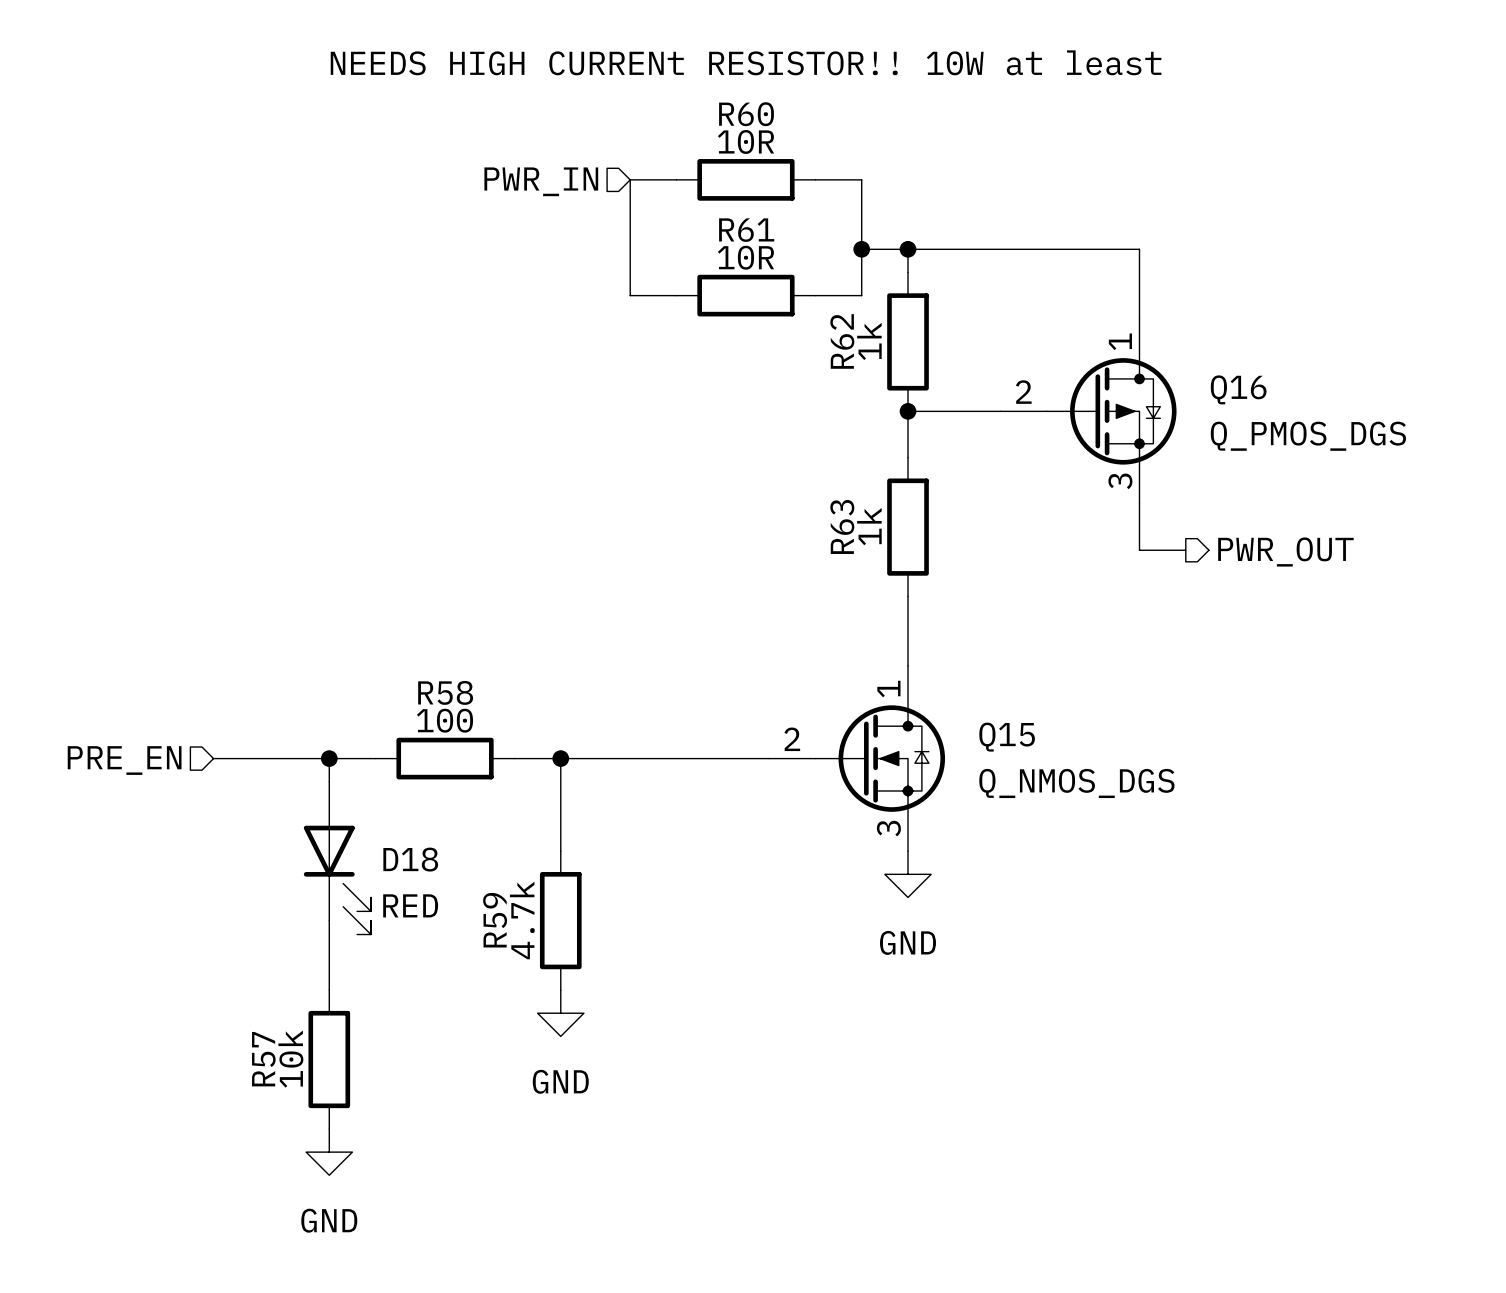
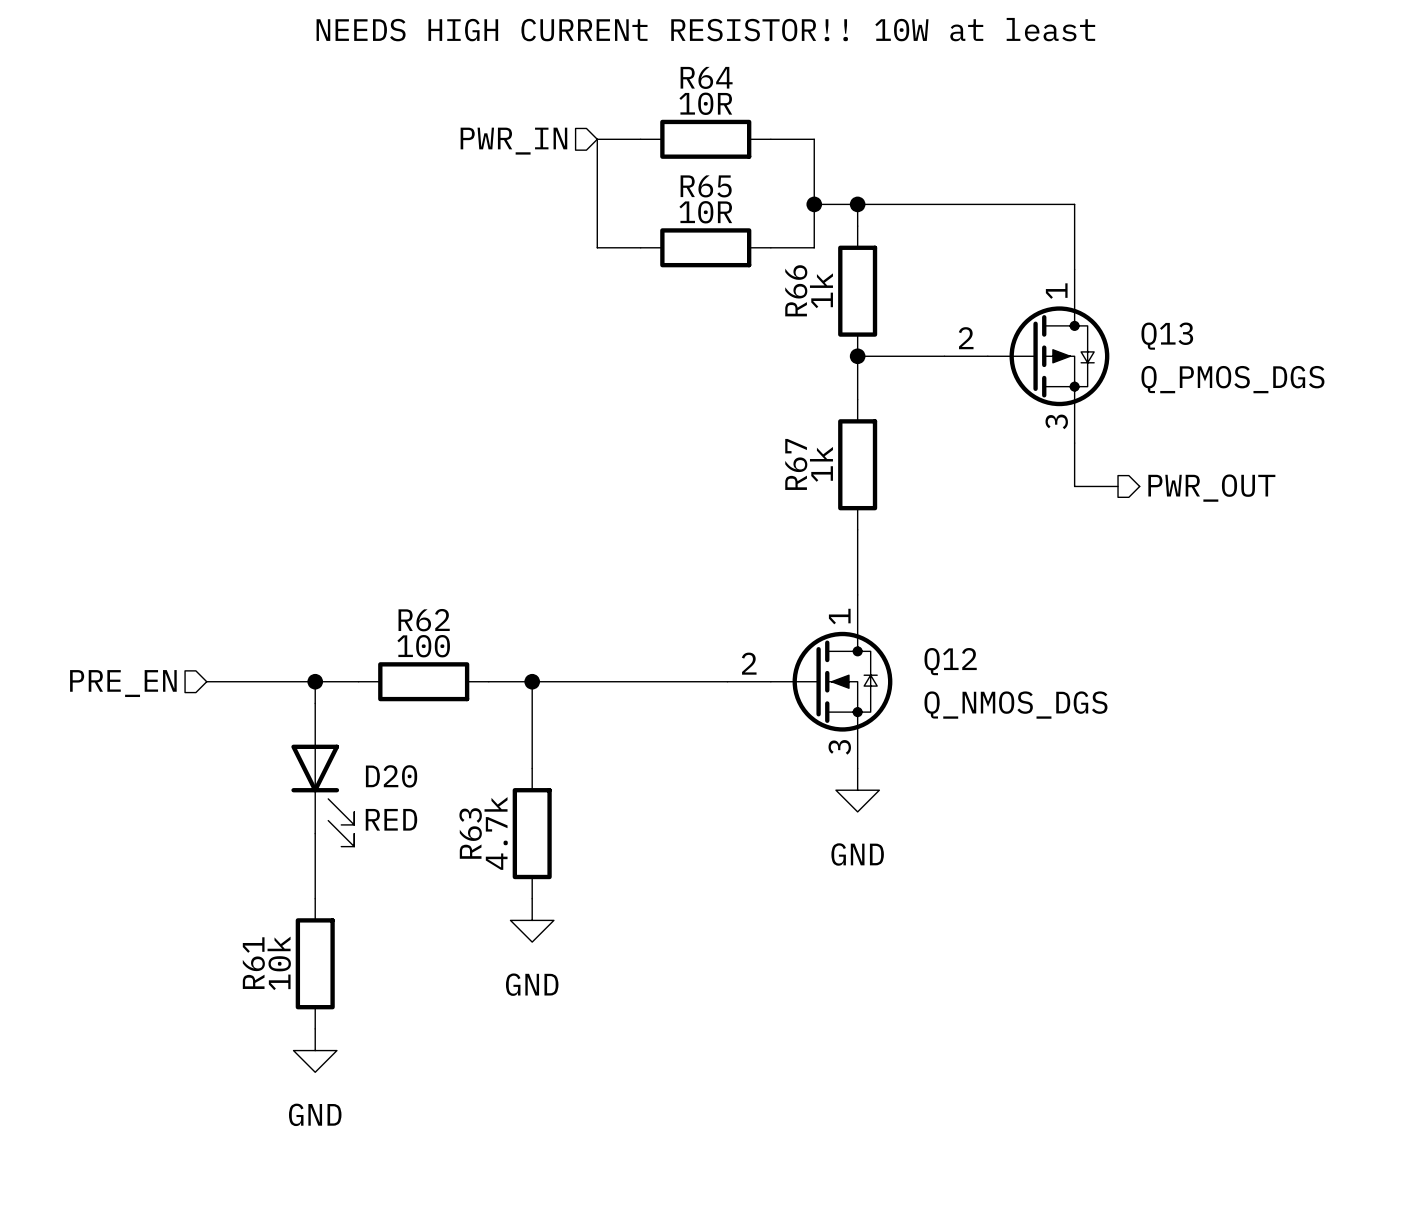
R60 name: R60 (746, 114) -> R64 (706, 77)
R61 name: R61 (746, 230) -> R65 (706, 186)
R62 name: R62 (842, 341) -> R66 (796, 290)
Q16 name: Q16 (1238, 389) -> Q13 (1167, 336)
R63 name: R63 (842, 526) -> R67 (796, 464)
R58 name: R58 (445, 692) -> R62 (424, 620)
Q15 name: Q15 (1007, 737) -> Q12 (950, 661)
D18 name: D18 (410, 859) -> D20 (391, 776)
R59 name: R59 (495, 920) -> R63 (470, 833)
R57 name: R57 (263, 1059) -> R61 (253, 963)

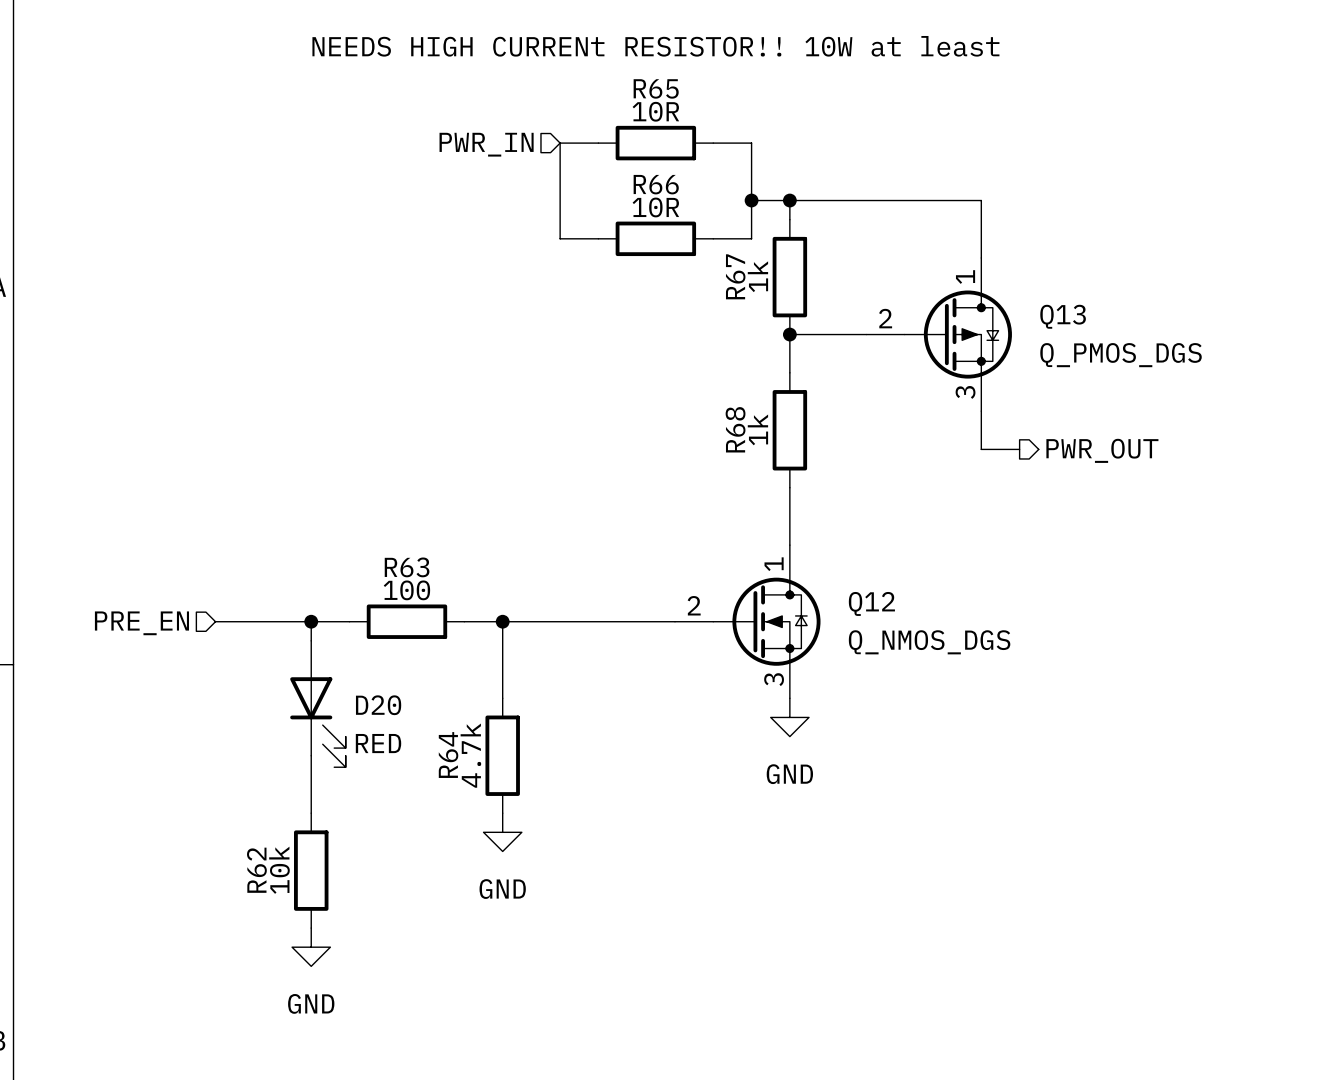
R64 name: R64 (706, 77) -> R65 (656, 88)
R65 name: R65 (706, 186) -> R66 (656, 184)
R66 name: R66 (796, 290) -> R67 (735, 276)
R67 name: R67 (796, 464) -> R68 (735, 429)
R62 name: R62 (424, 620) -> R63 (407, 567)
R63 name: R63 (470, 833) -> R64 (448, 755)
R61 name: R61 (253, 963) -> R62 (256, 870)

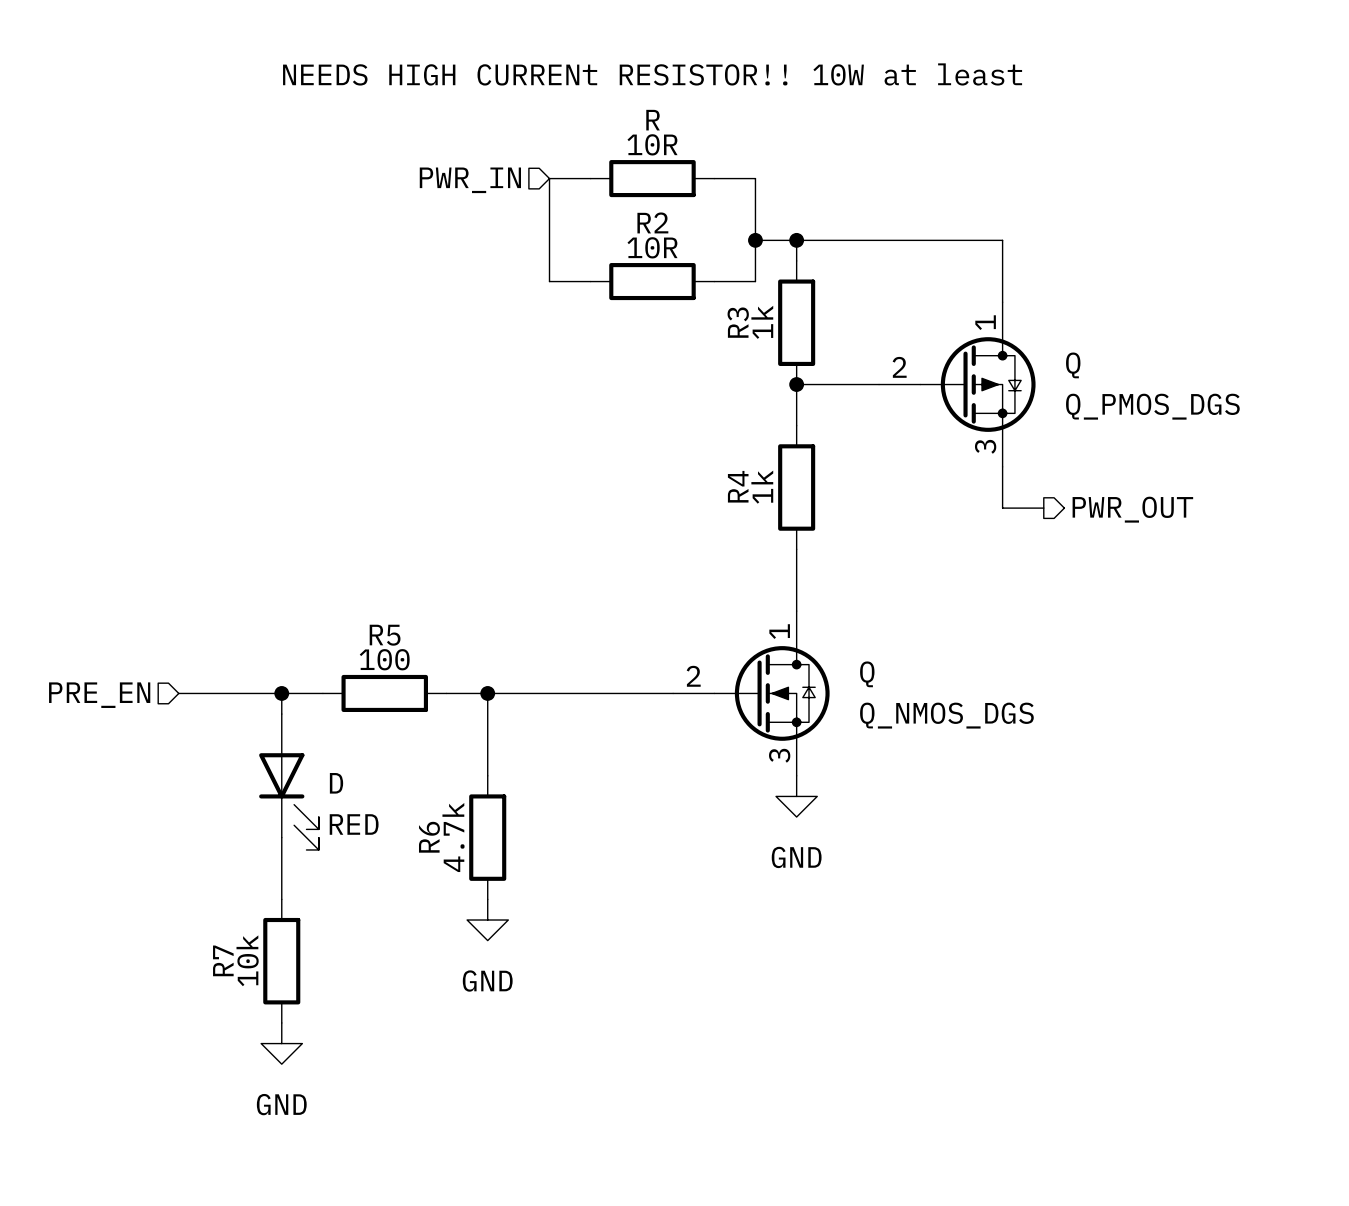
R65 name: R65 (656, 88) -> R (653, 120)
R66 name: R66 (656, 184) -> R2 (652, 222)
R67 name: R67 (735, 276) -> R3 (738, 322)
Q13 name: Q13 (1063, 316) -> Q (1073, 365)
R68 name: R68 (735, 429) -> R4 (738, 486)
R63 name: R63 (407, 567) -> R5 (385, 635)
Q12 name: Q12 (871, 603) -> Q (867, 674)
D20 name: D20 (378, 705) -> D (336, 783)
R64 name: R64 (448, 755) -> R6 (429, 837)
R62 name: R62 (256, 870) -> R7 (223, 960)

